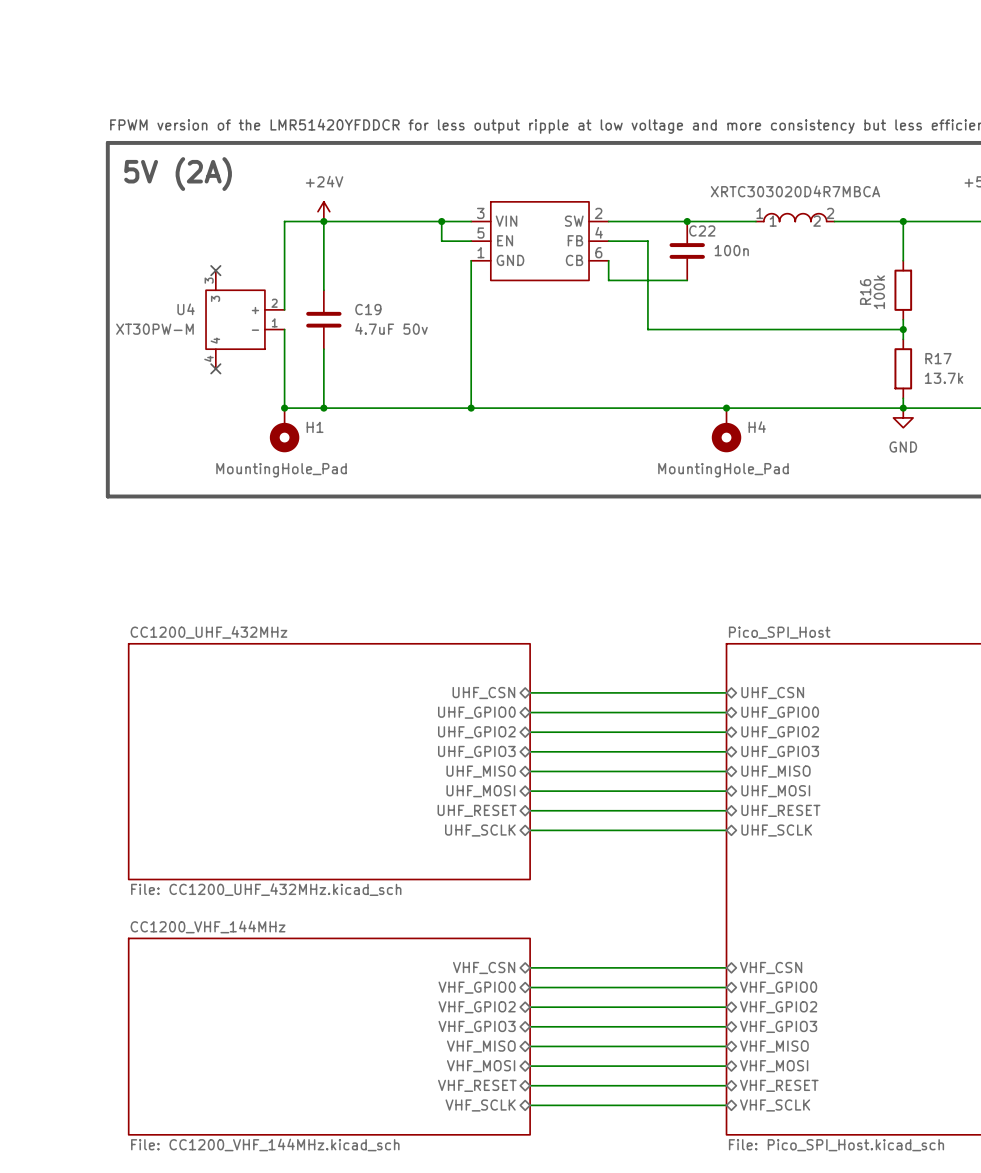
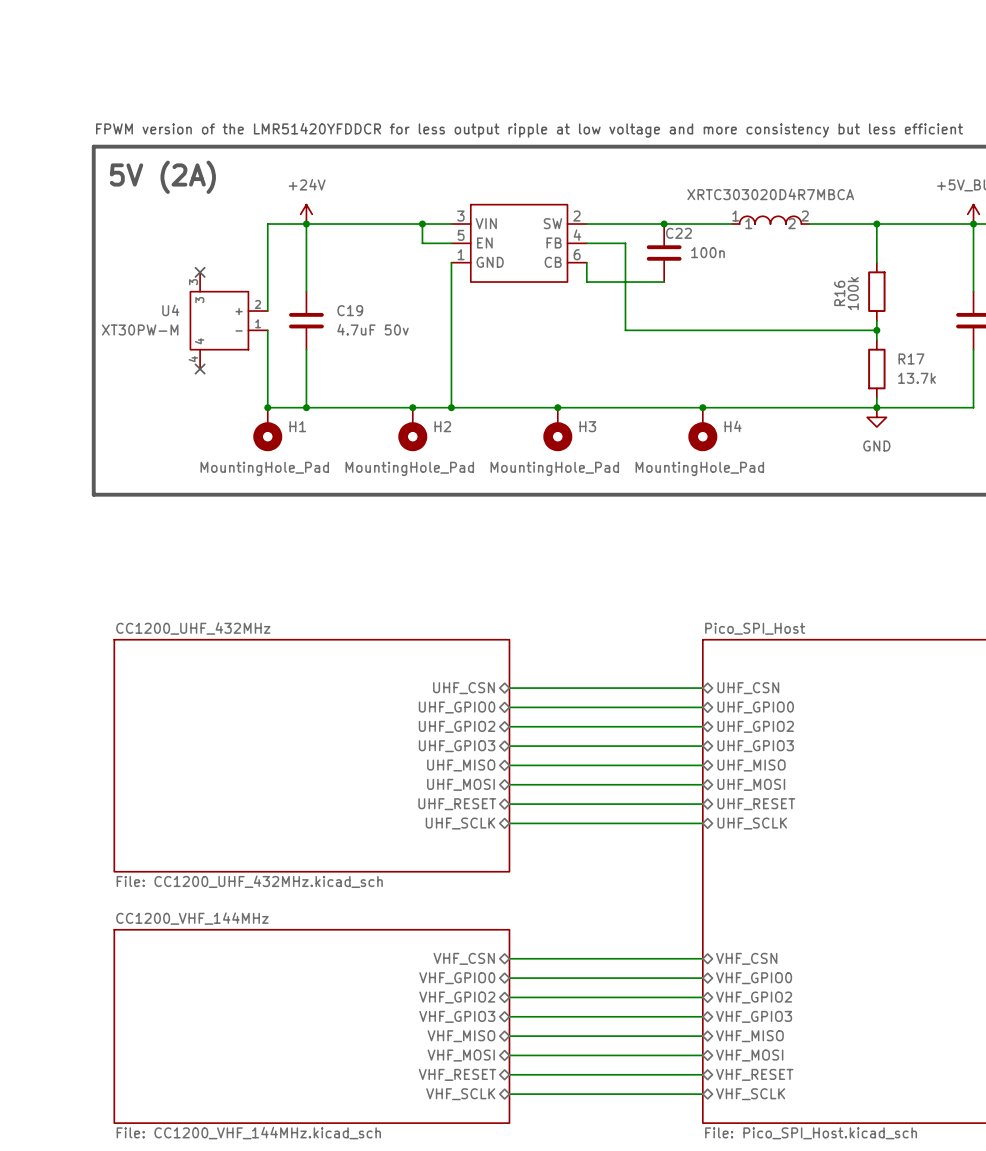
junction: none -> (412, 407)
junction: none -> (557, 407)
H2: none -> MountingHole_Pad (412, 429)
H3: none -> MountingHole_Pad (557, 429)

